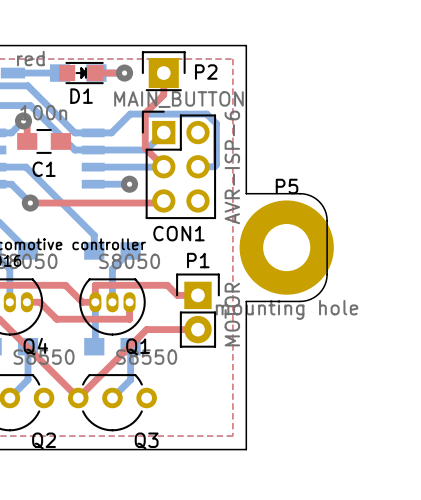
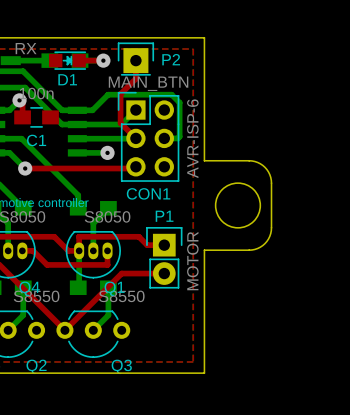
D1 value: red (30, 58) -> RX (26, 48)
P2 value: MAIN_BUTTON (178, 99) -> MAIN_BTN (148, 83)
round board edge: none -> [215, 182, 261, 229]
P5: mounting hole (286, 247) -> none

